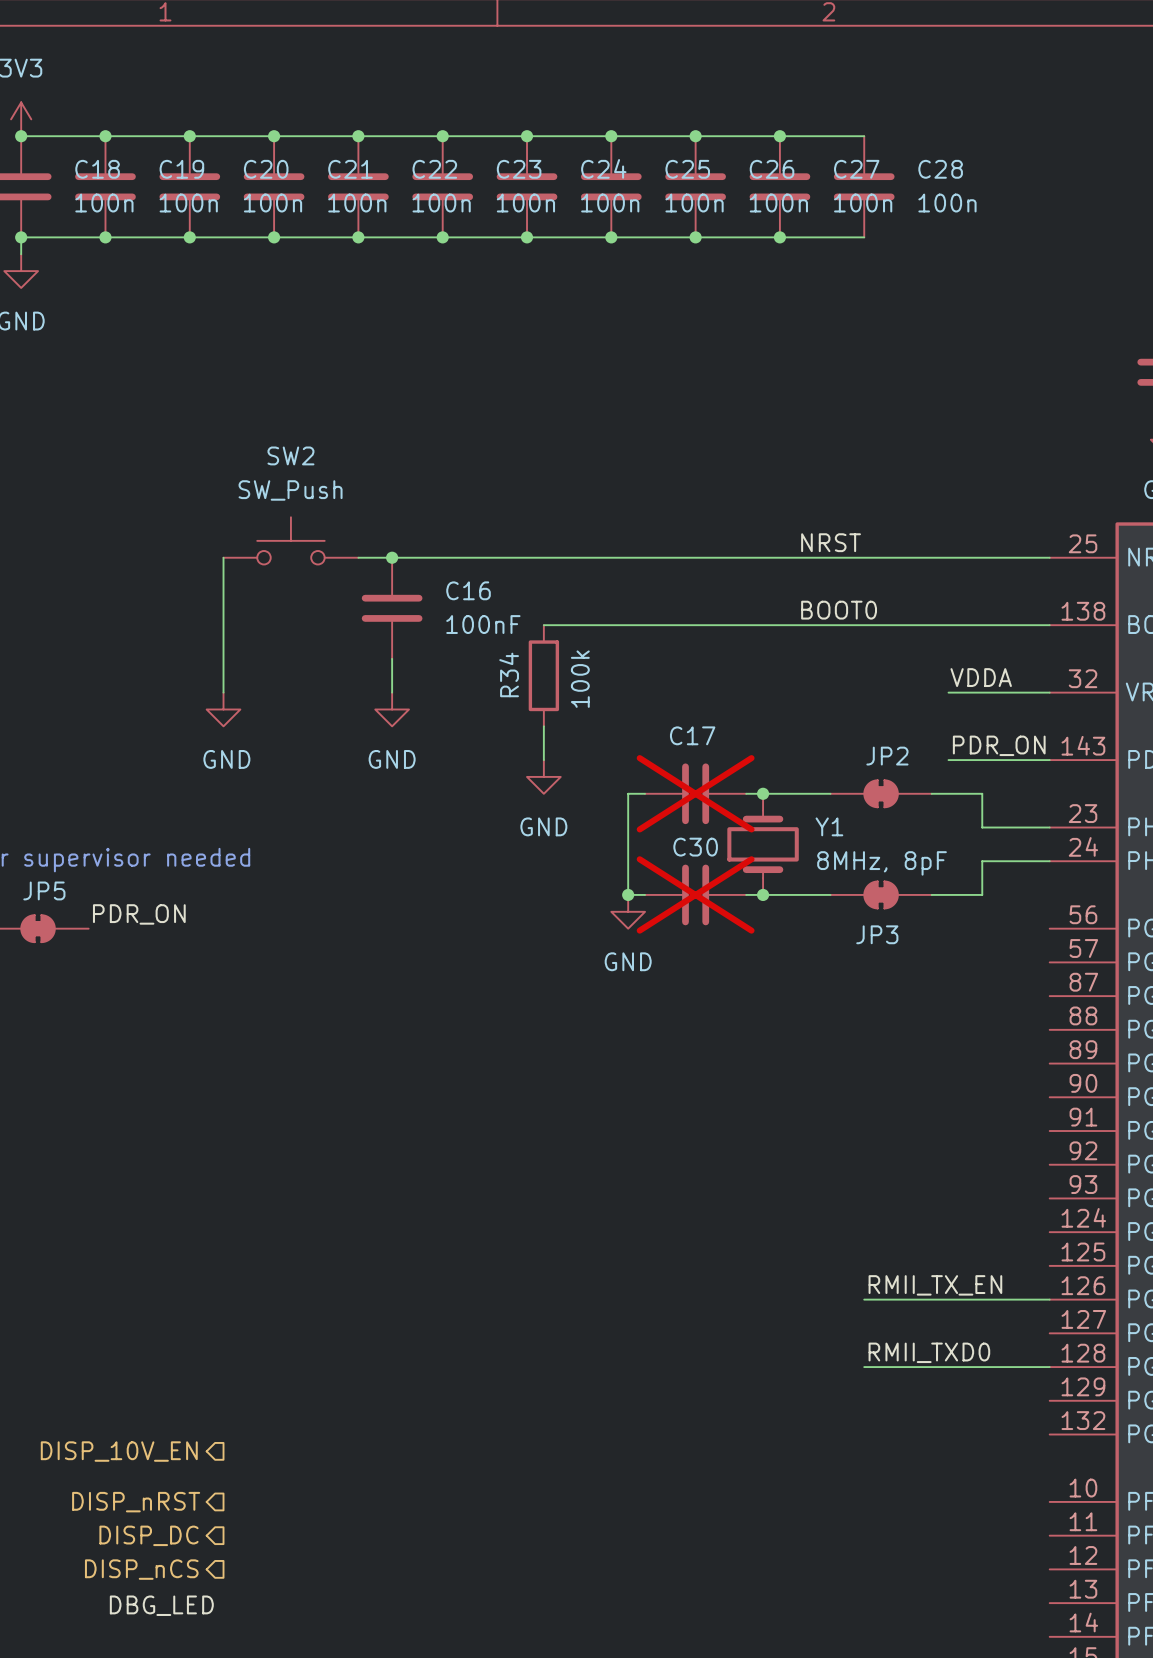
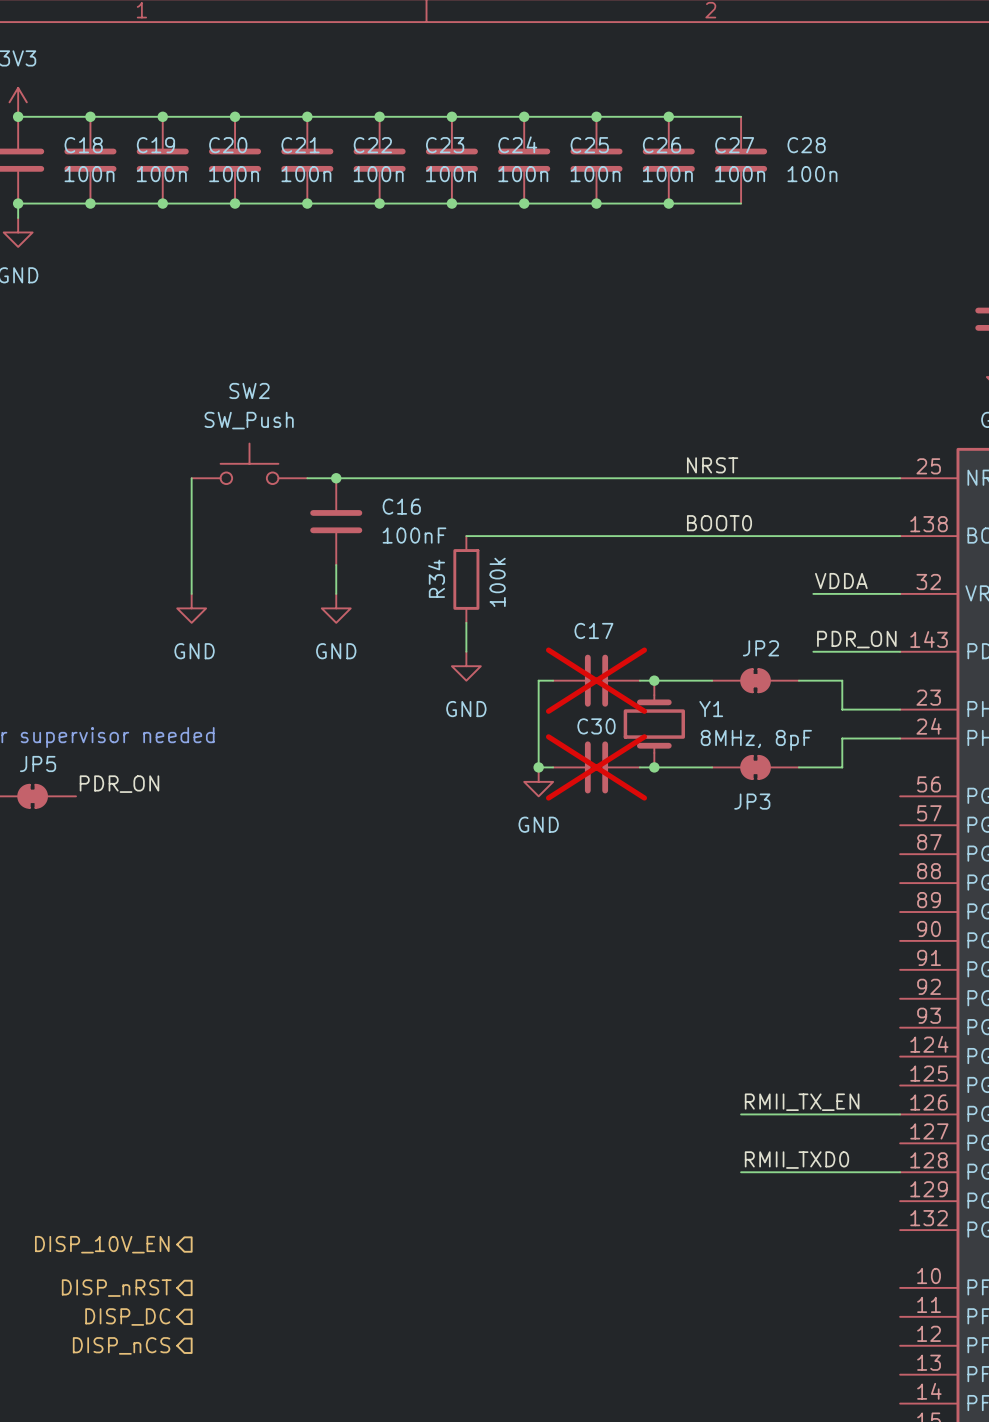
label: DBG_LED (161, 1605) -> none

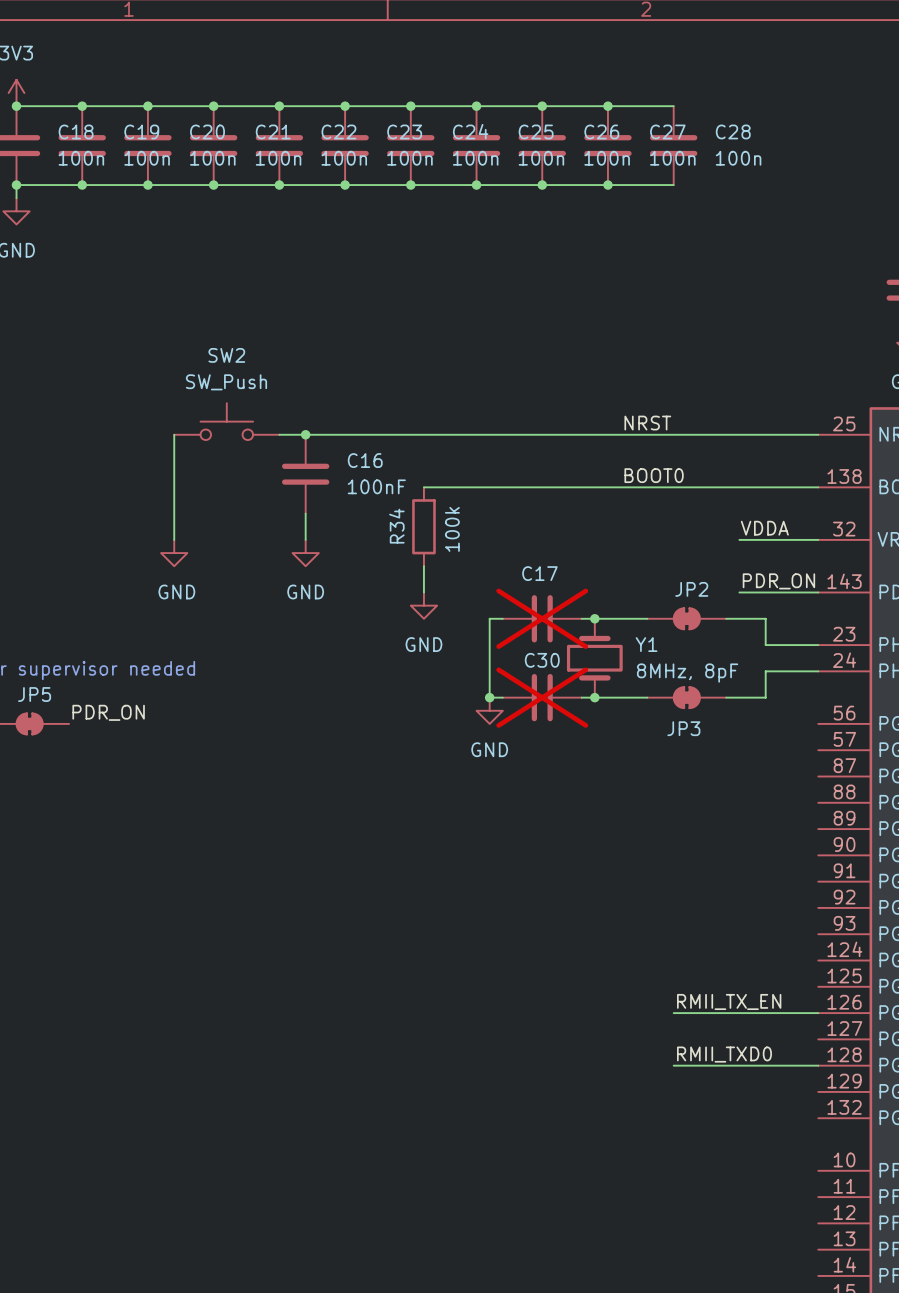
hierarchical label: DISP_10V_EN (102, 1244) -> none
hierarchical label: DISP_nRST (116, 1288) -> none
hierarchical label: DISP_DC (127, 1316) -> none
hierarchical label: DISP_nCS (121, 1345) -> none

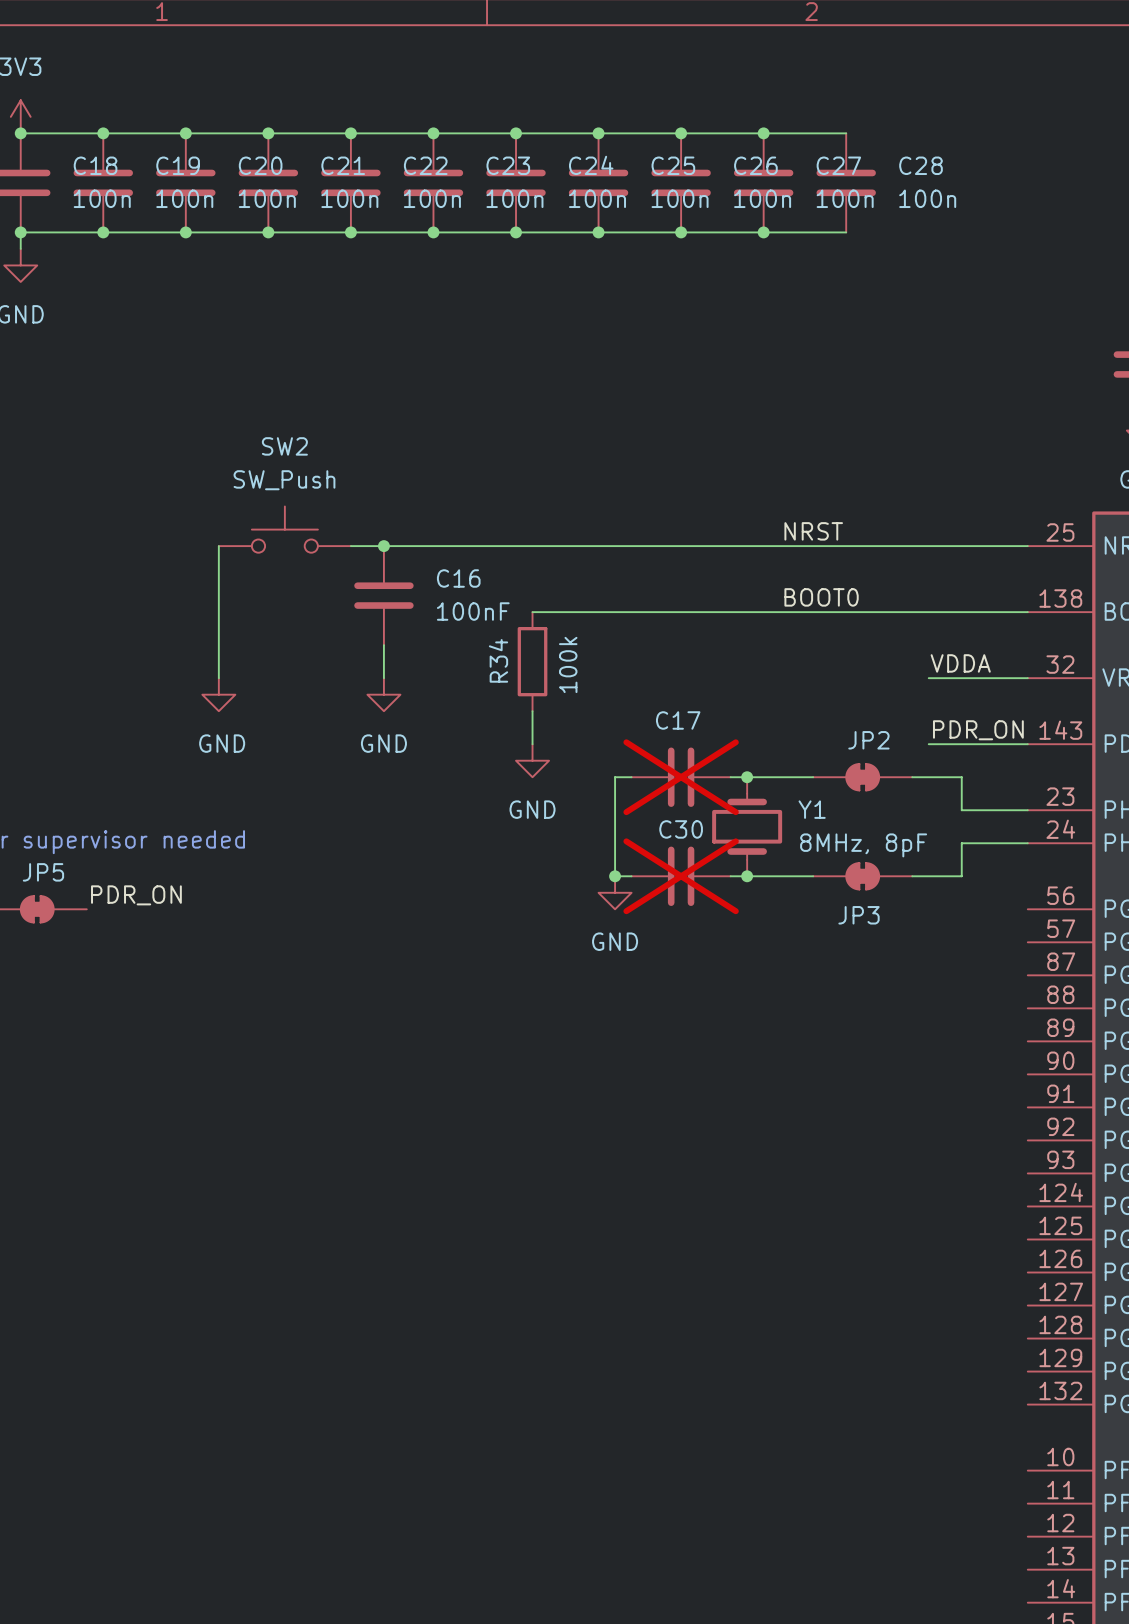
label: RMII_TX_EN (729, 1001) -> none
wire: (673, 1013) (818, 1013) -> none
label: RMII_TXD0 (724, 1054) -> none
wire: (673, 1065) (818, 1065) -> none

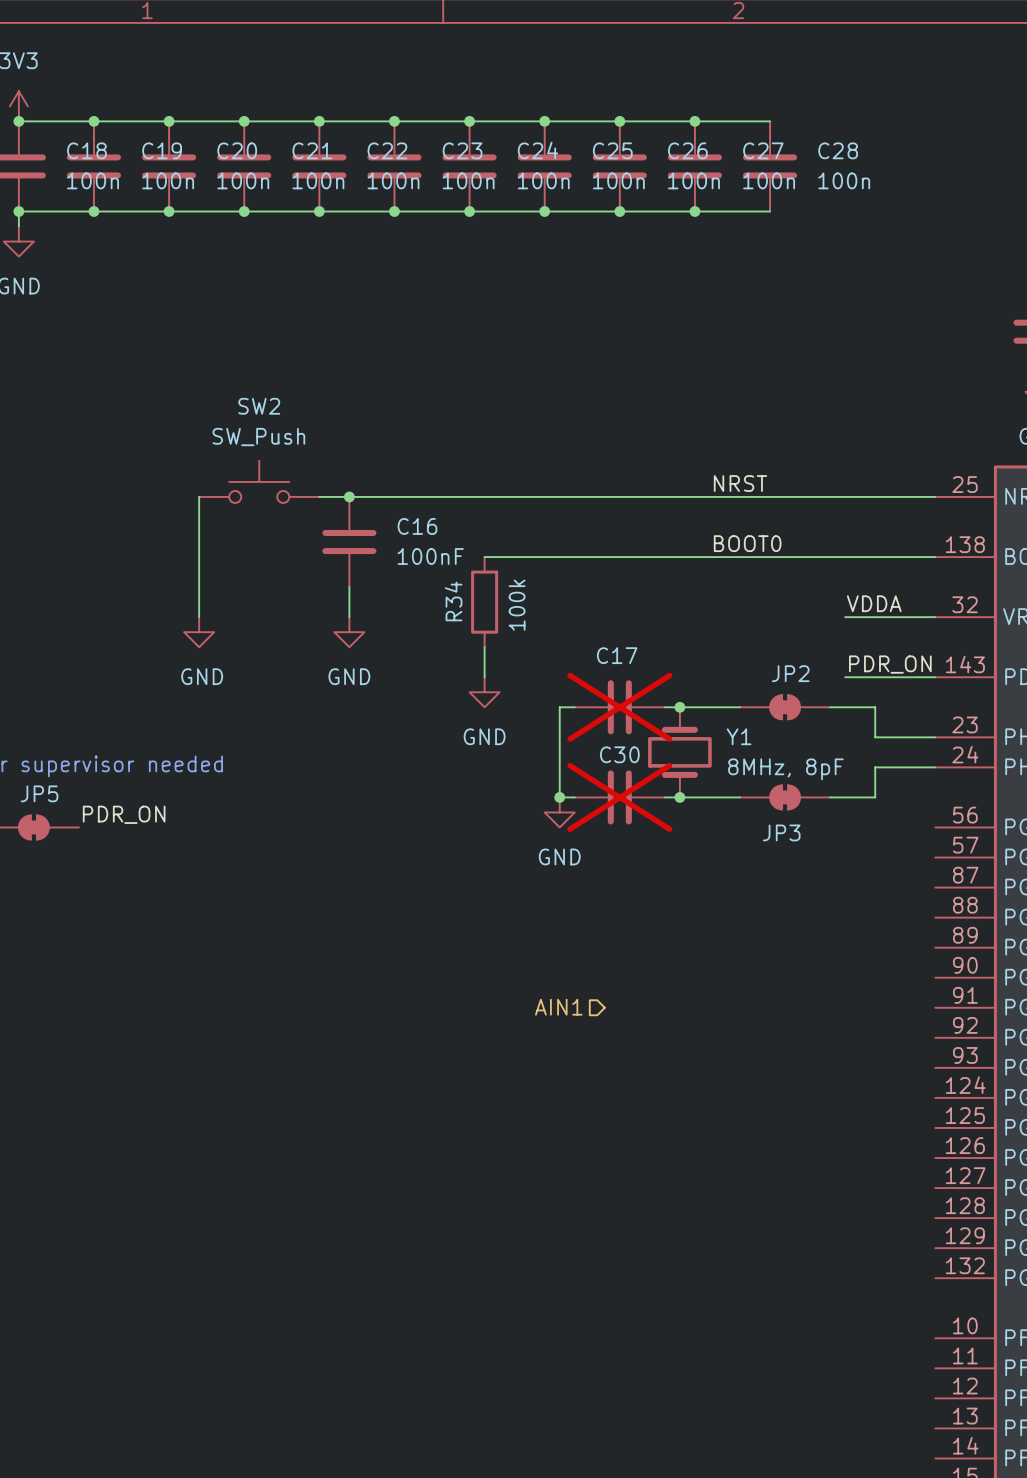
hierarchical label: none -> AIN1 (558, 1007)

